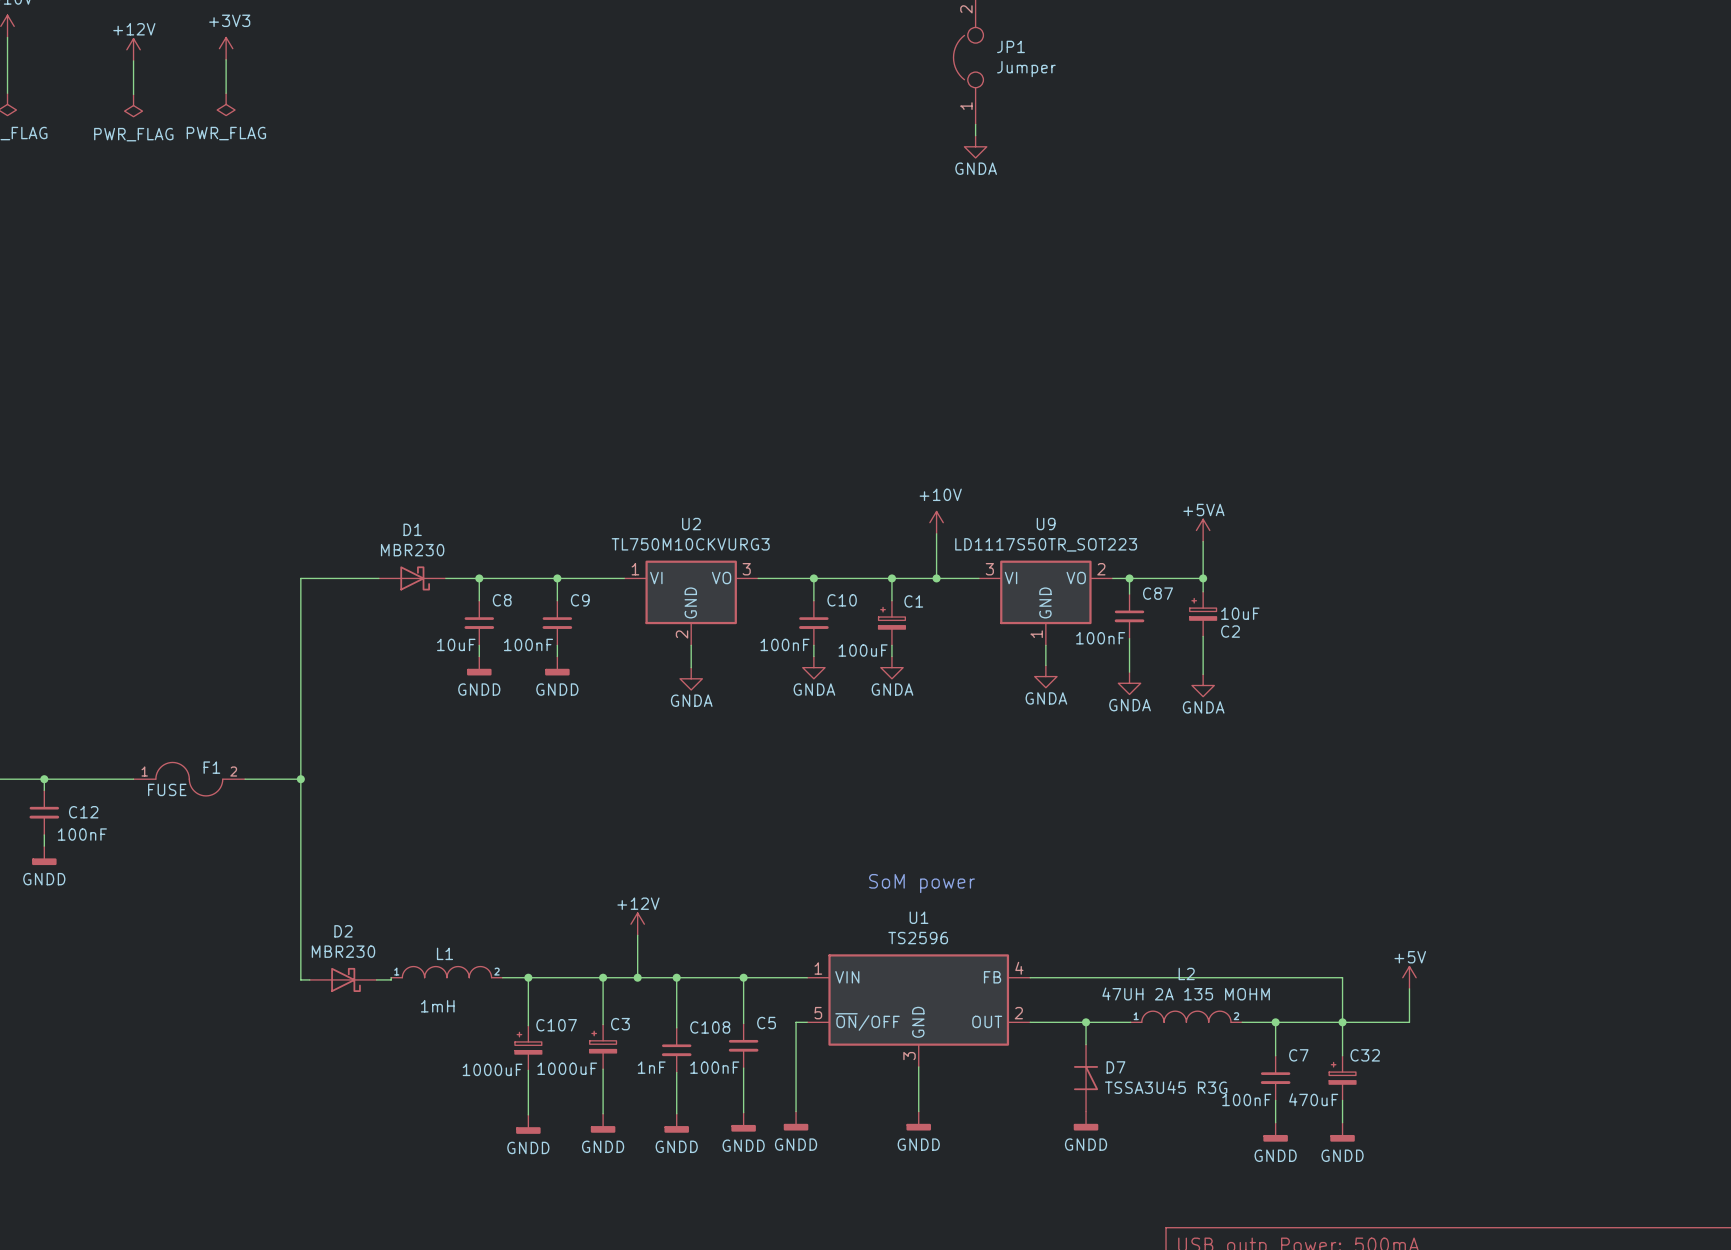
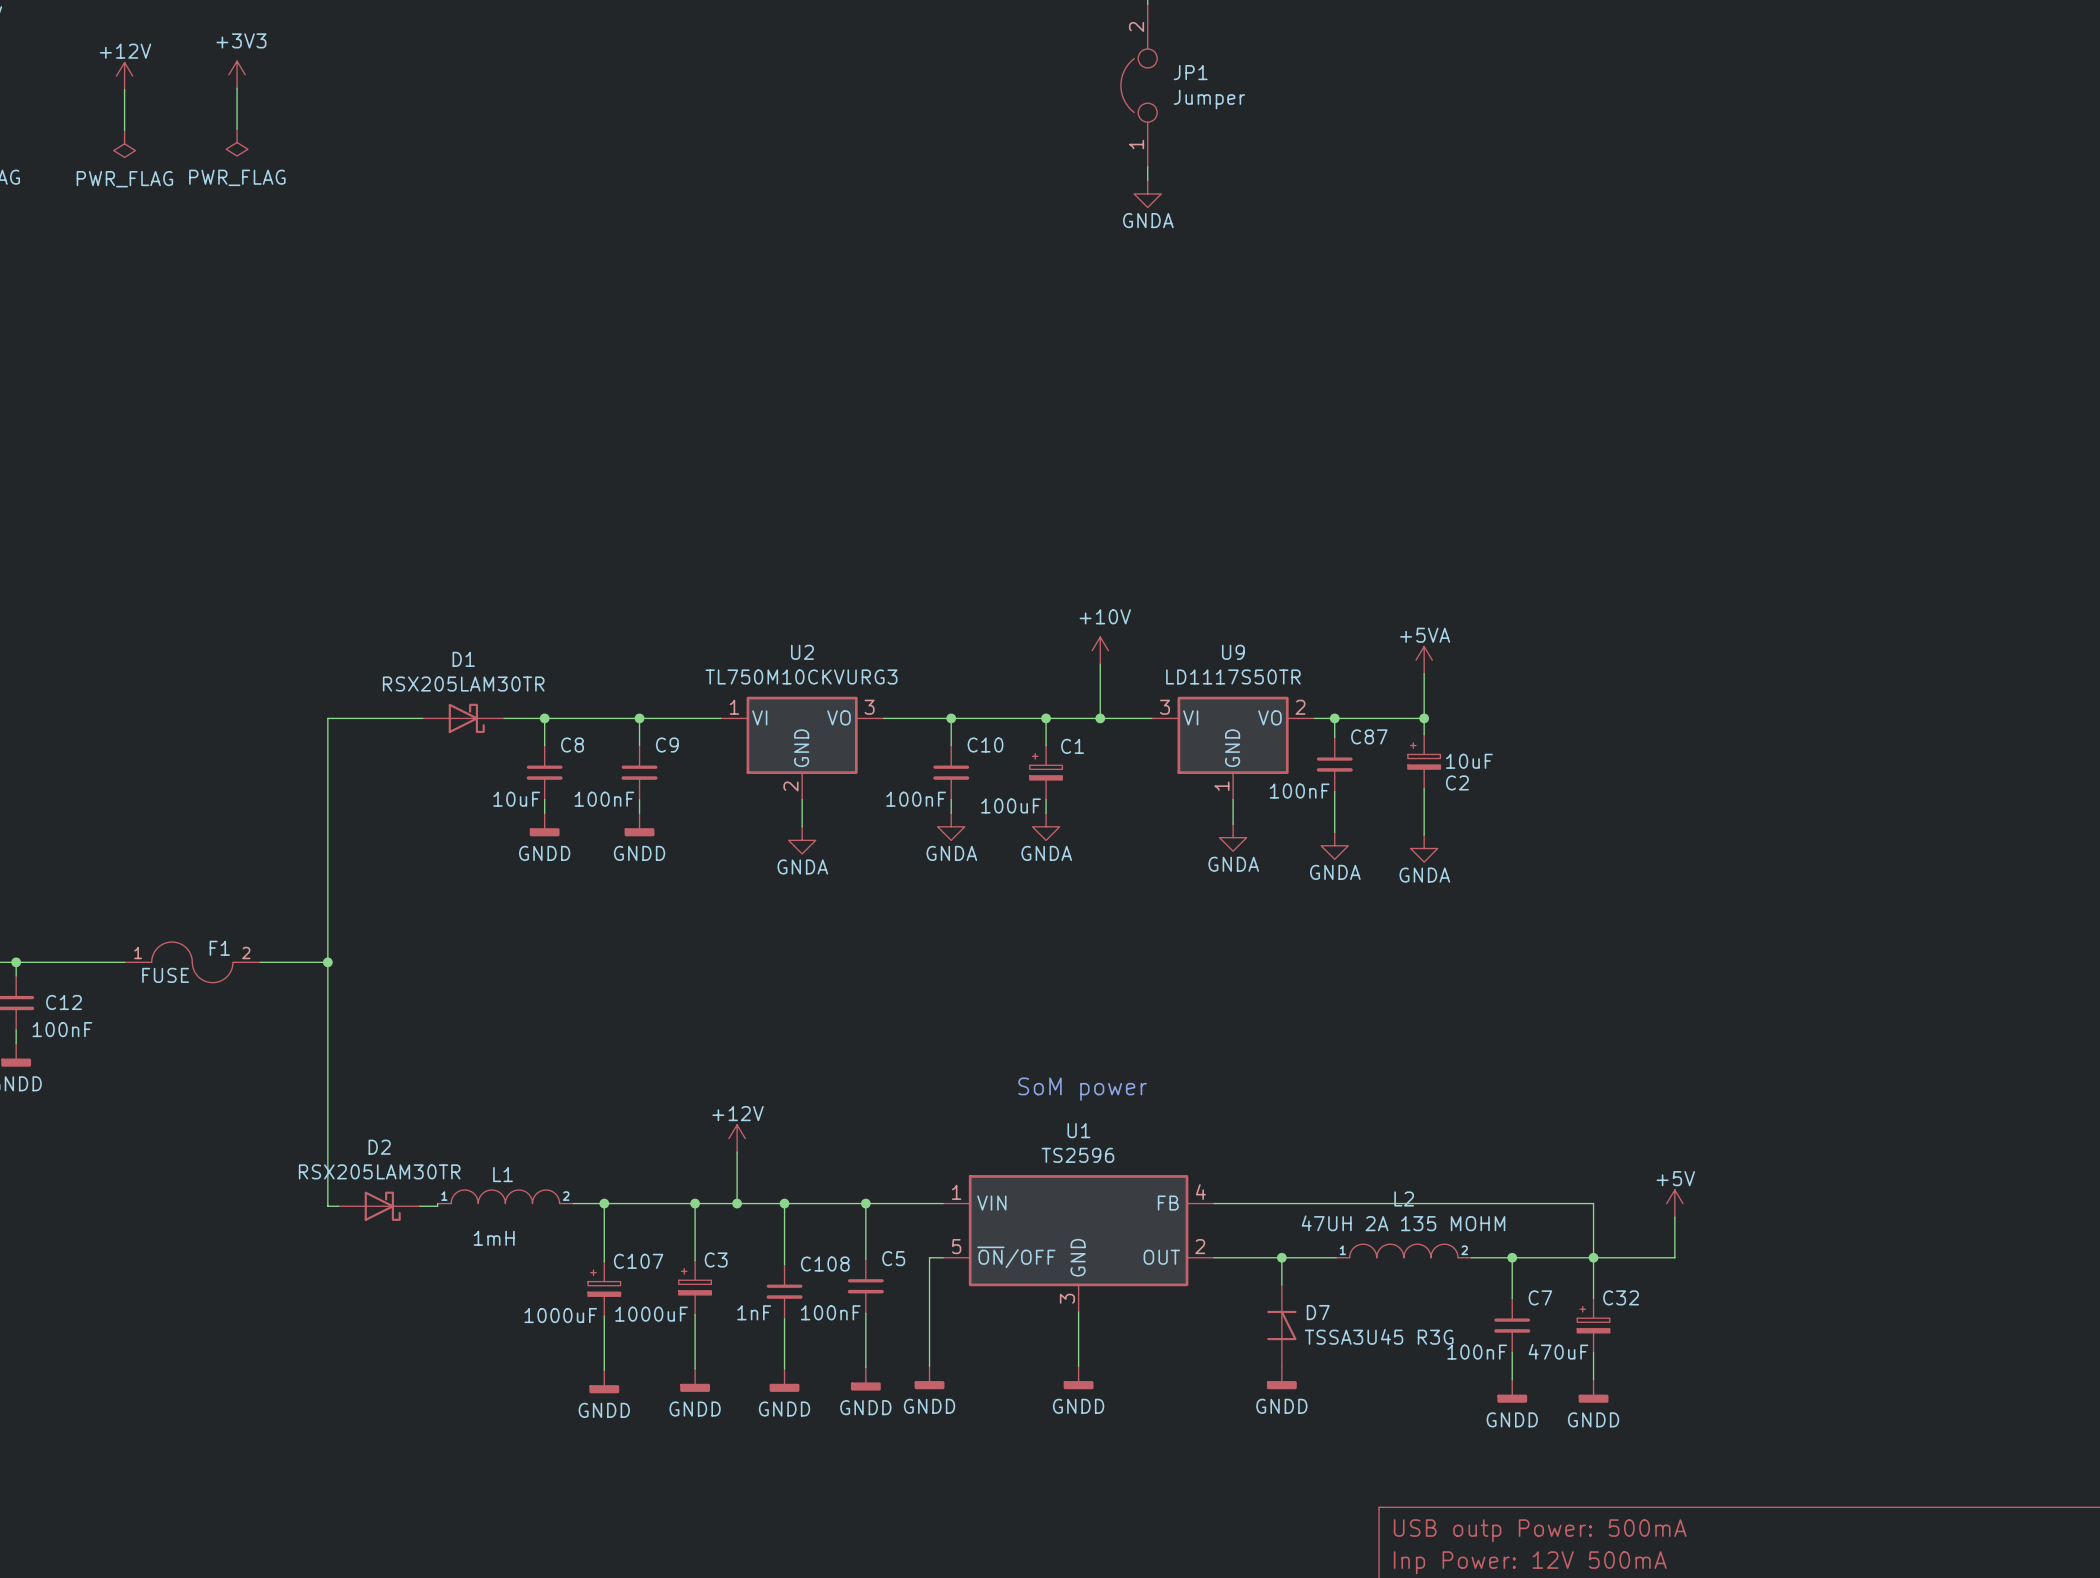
U9 value: LD1117S50TR_SOT223 (1046, 544) -> LD1117S50TR (1233, 676)
D1 value: MBR230 (412, 550) -> RSX205LAM30TR (463, 684)
D2 value: MBR230 (343, 951) -> RSX205LAM30TR (379, 1171)

